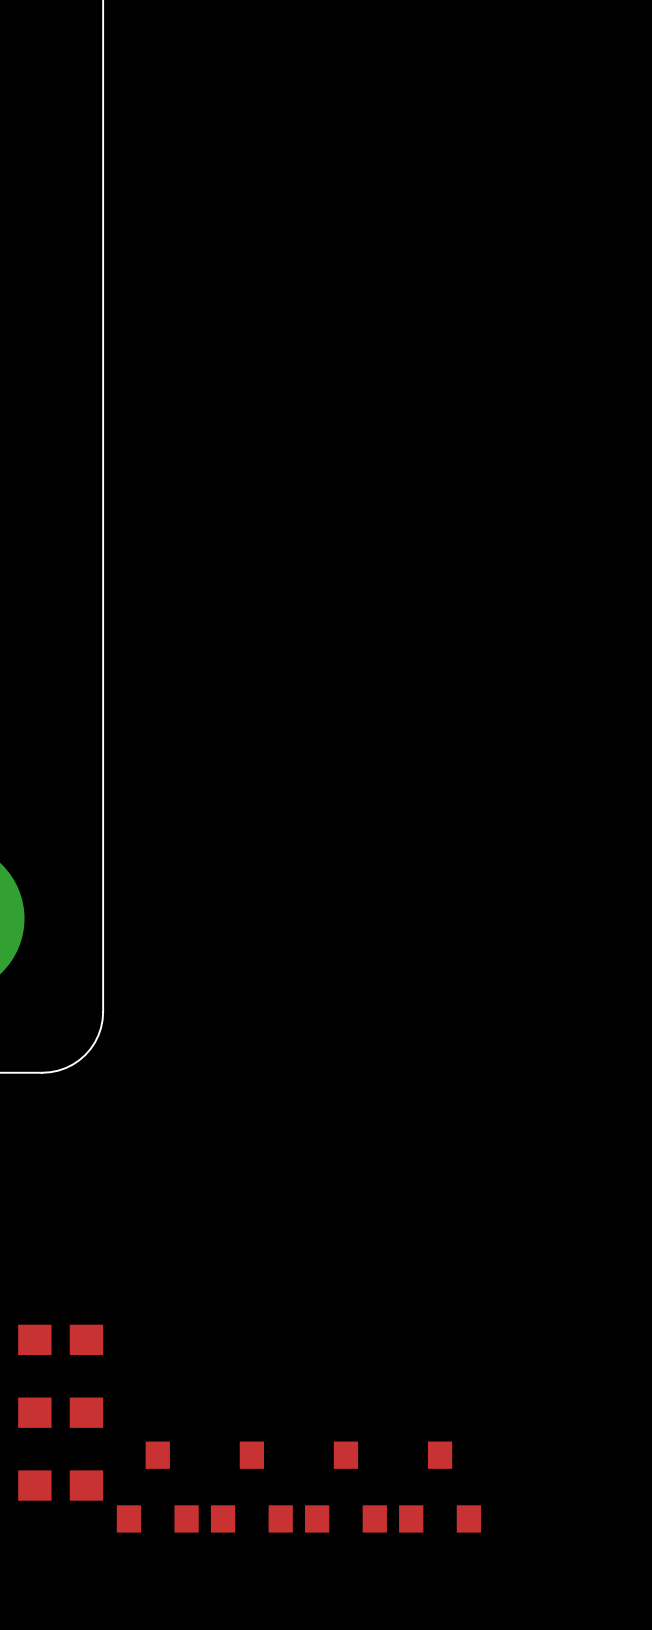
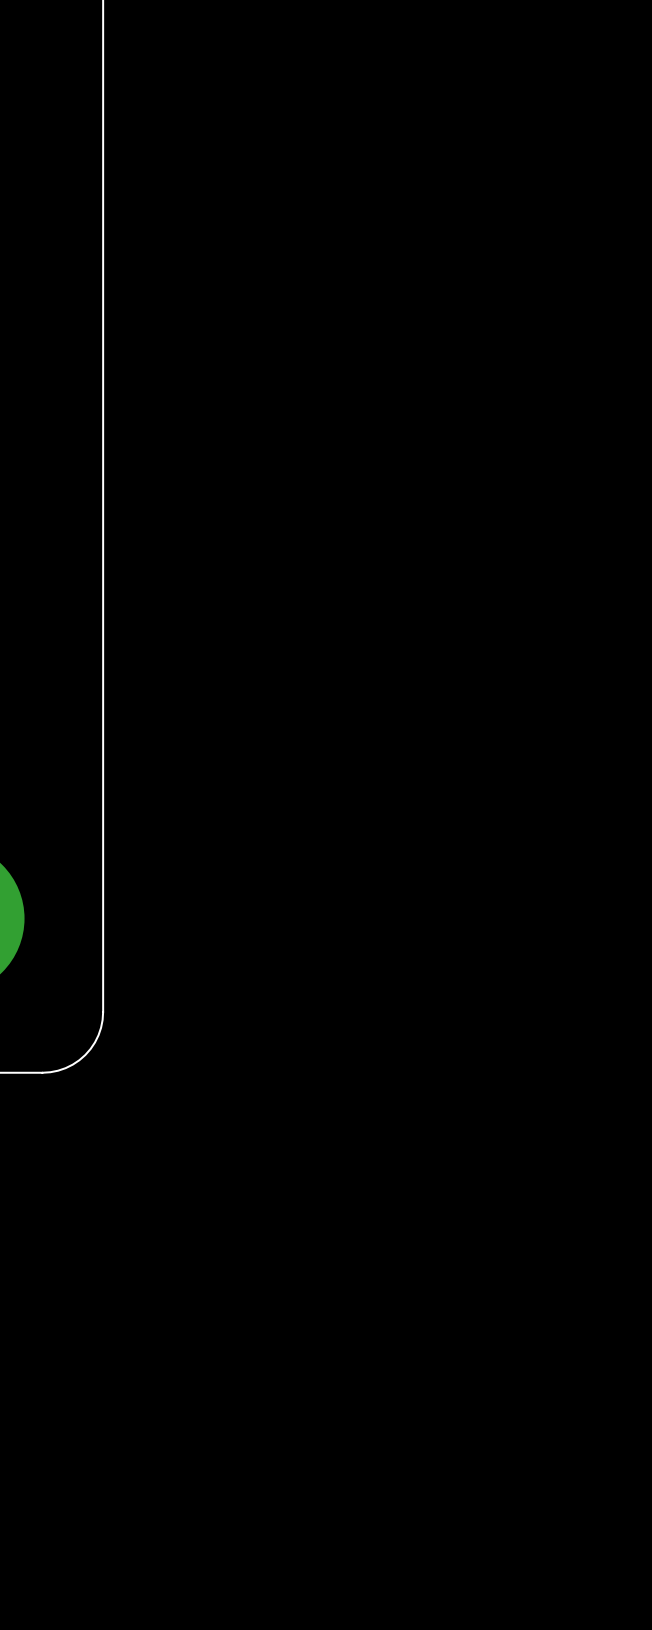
part: (60, 1339) -> none
part: (60, 1412) -> none
part: (60, 1485) -> none
part: (157, 1487) -> none
part: (251, 1487) -> none
part: (345, 1487) -> none
part: (440, 1487) -> none

